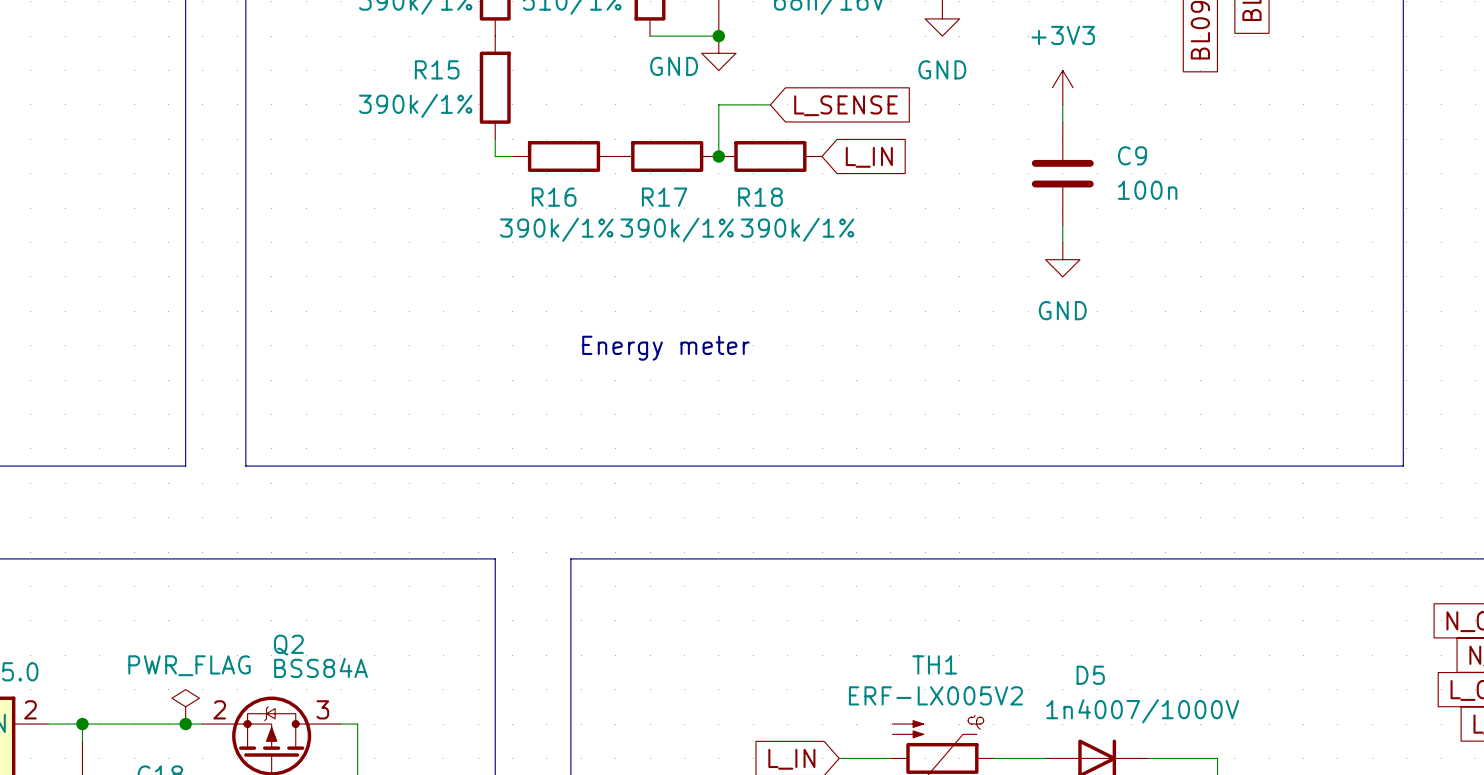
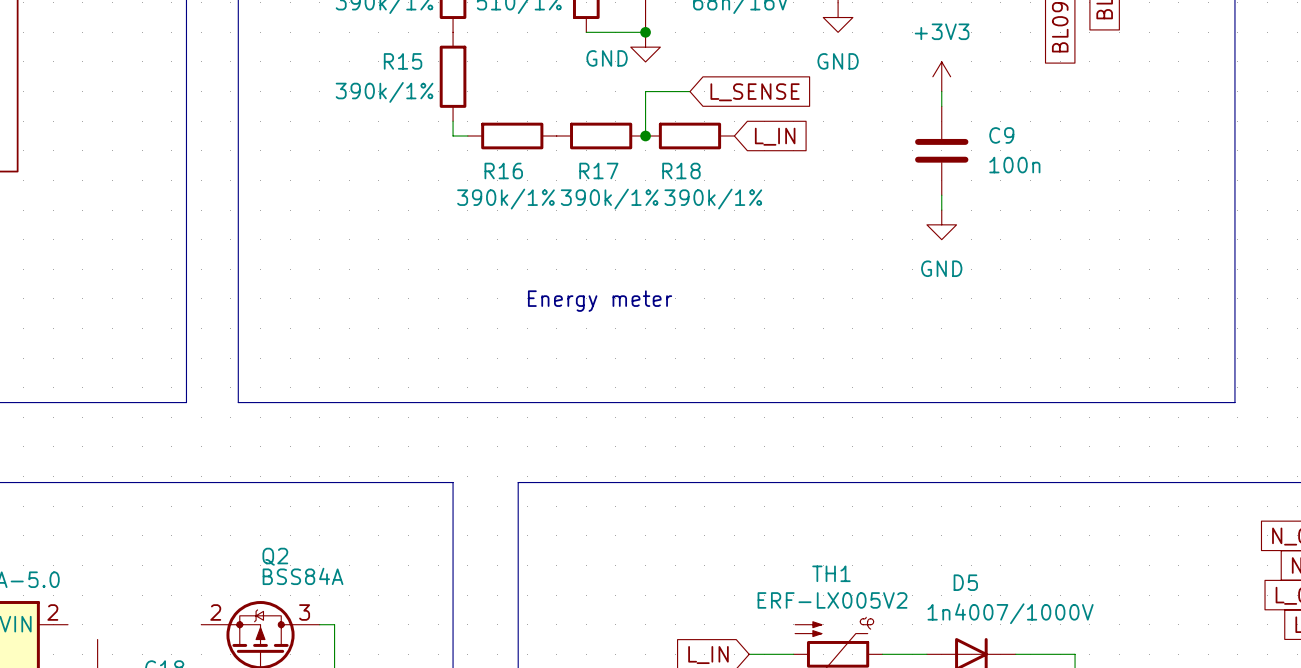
power symbol: PWR_FLAG (185, 706) -> none
wire: (48, 724) (202, 724) -> none
wire: (82, 724) (82, 741) -> none
junction: (82, 724) -> none
junction: (185, 724) -> none

